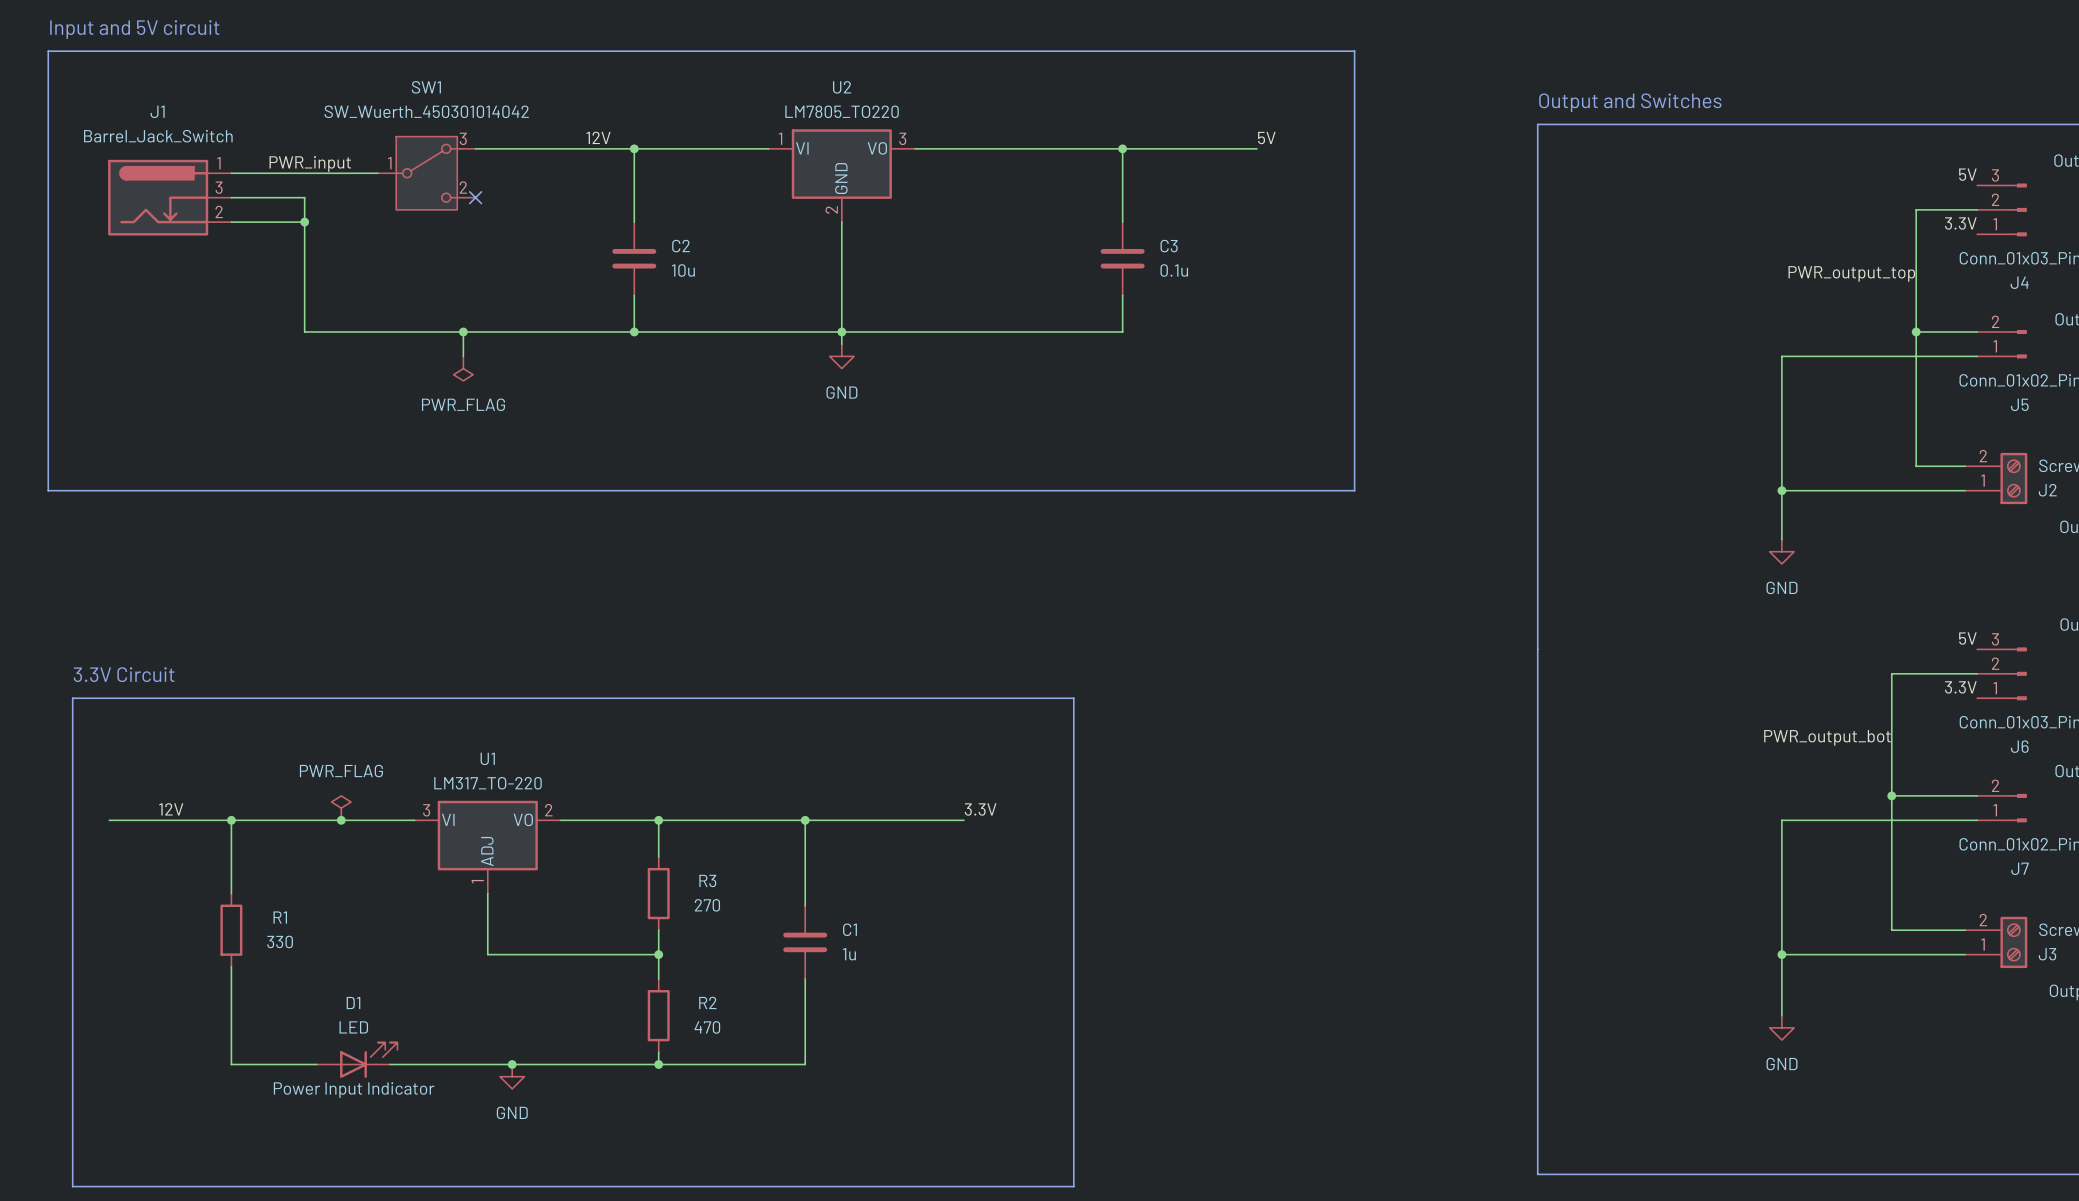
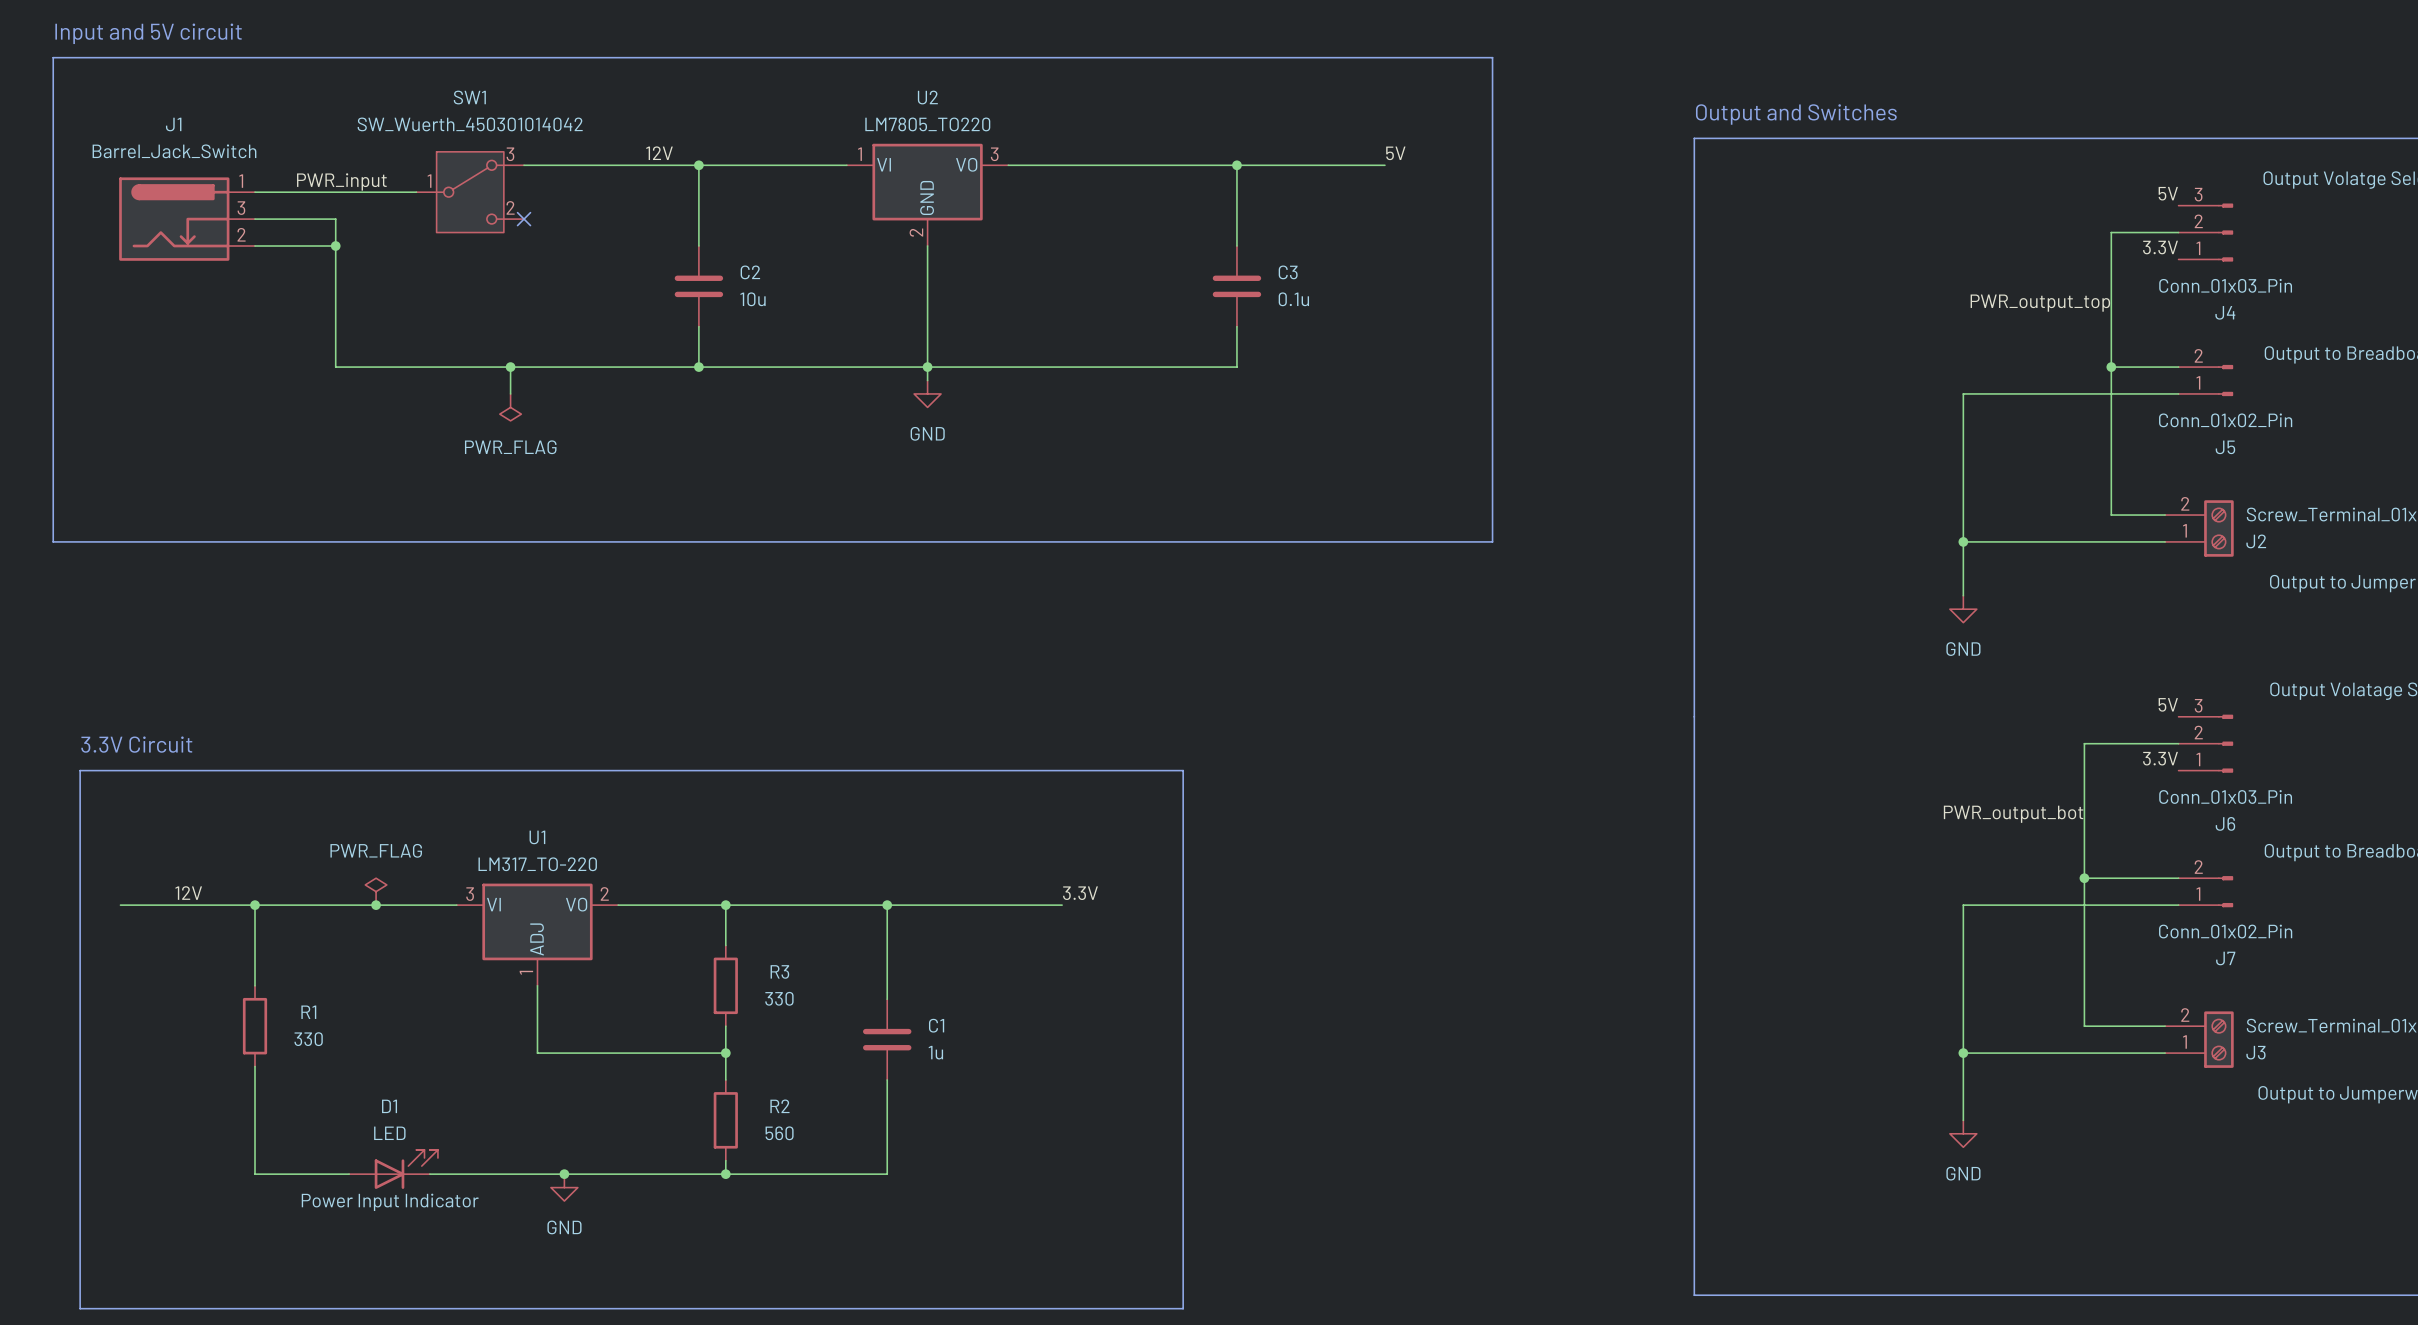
R3 value: 270 (707, 905) -> 330 (779, 998)
R2 value: 470 (707, 1027) -> 560 (779, 1133)

